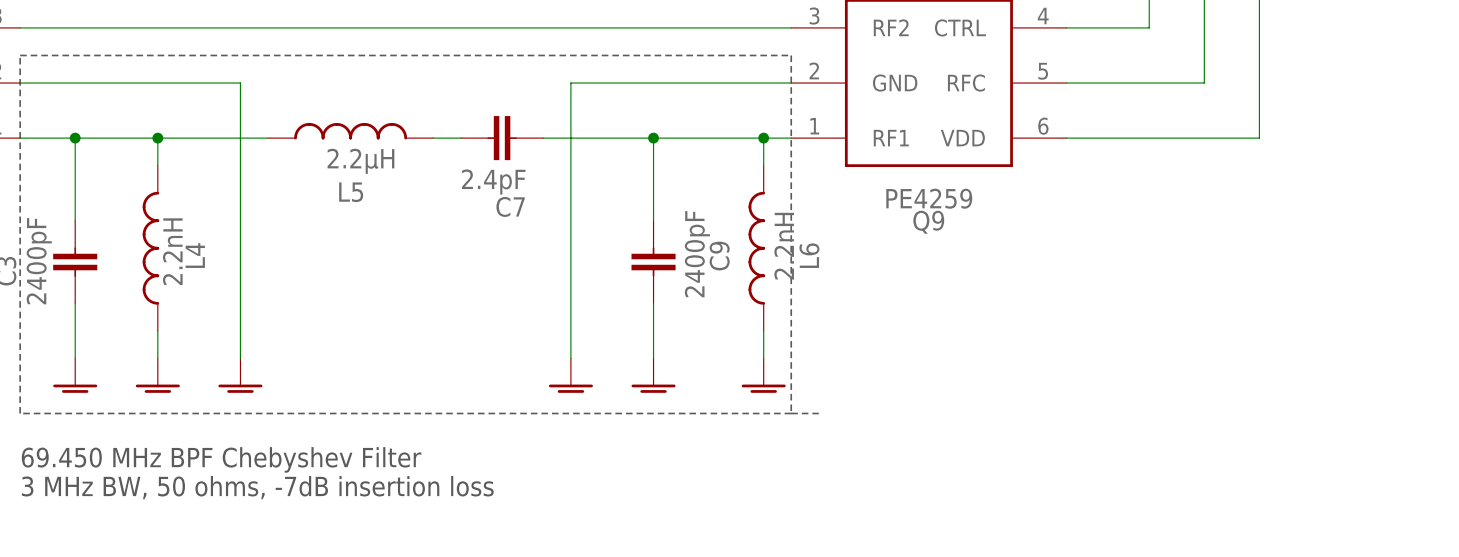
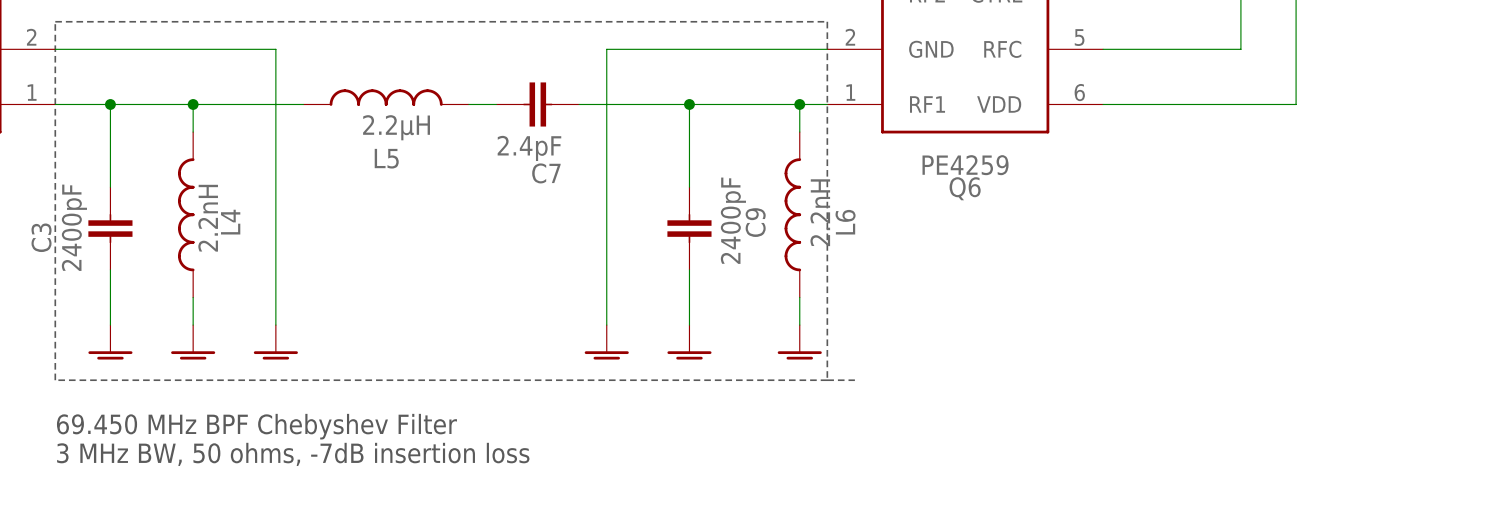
Q9 name: Q9 (928, 222) -> Q6 (965, 188)

